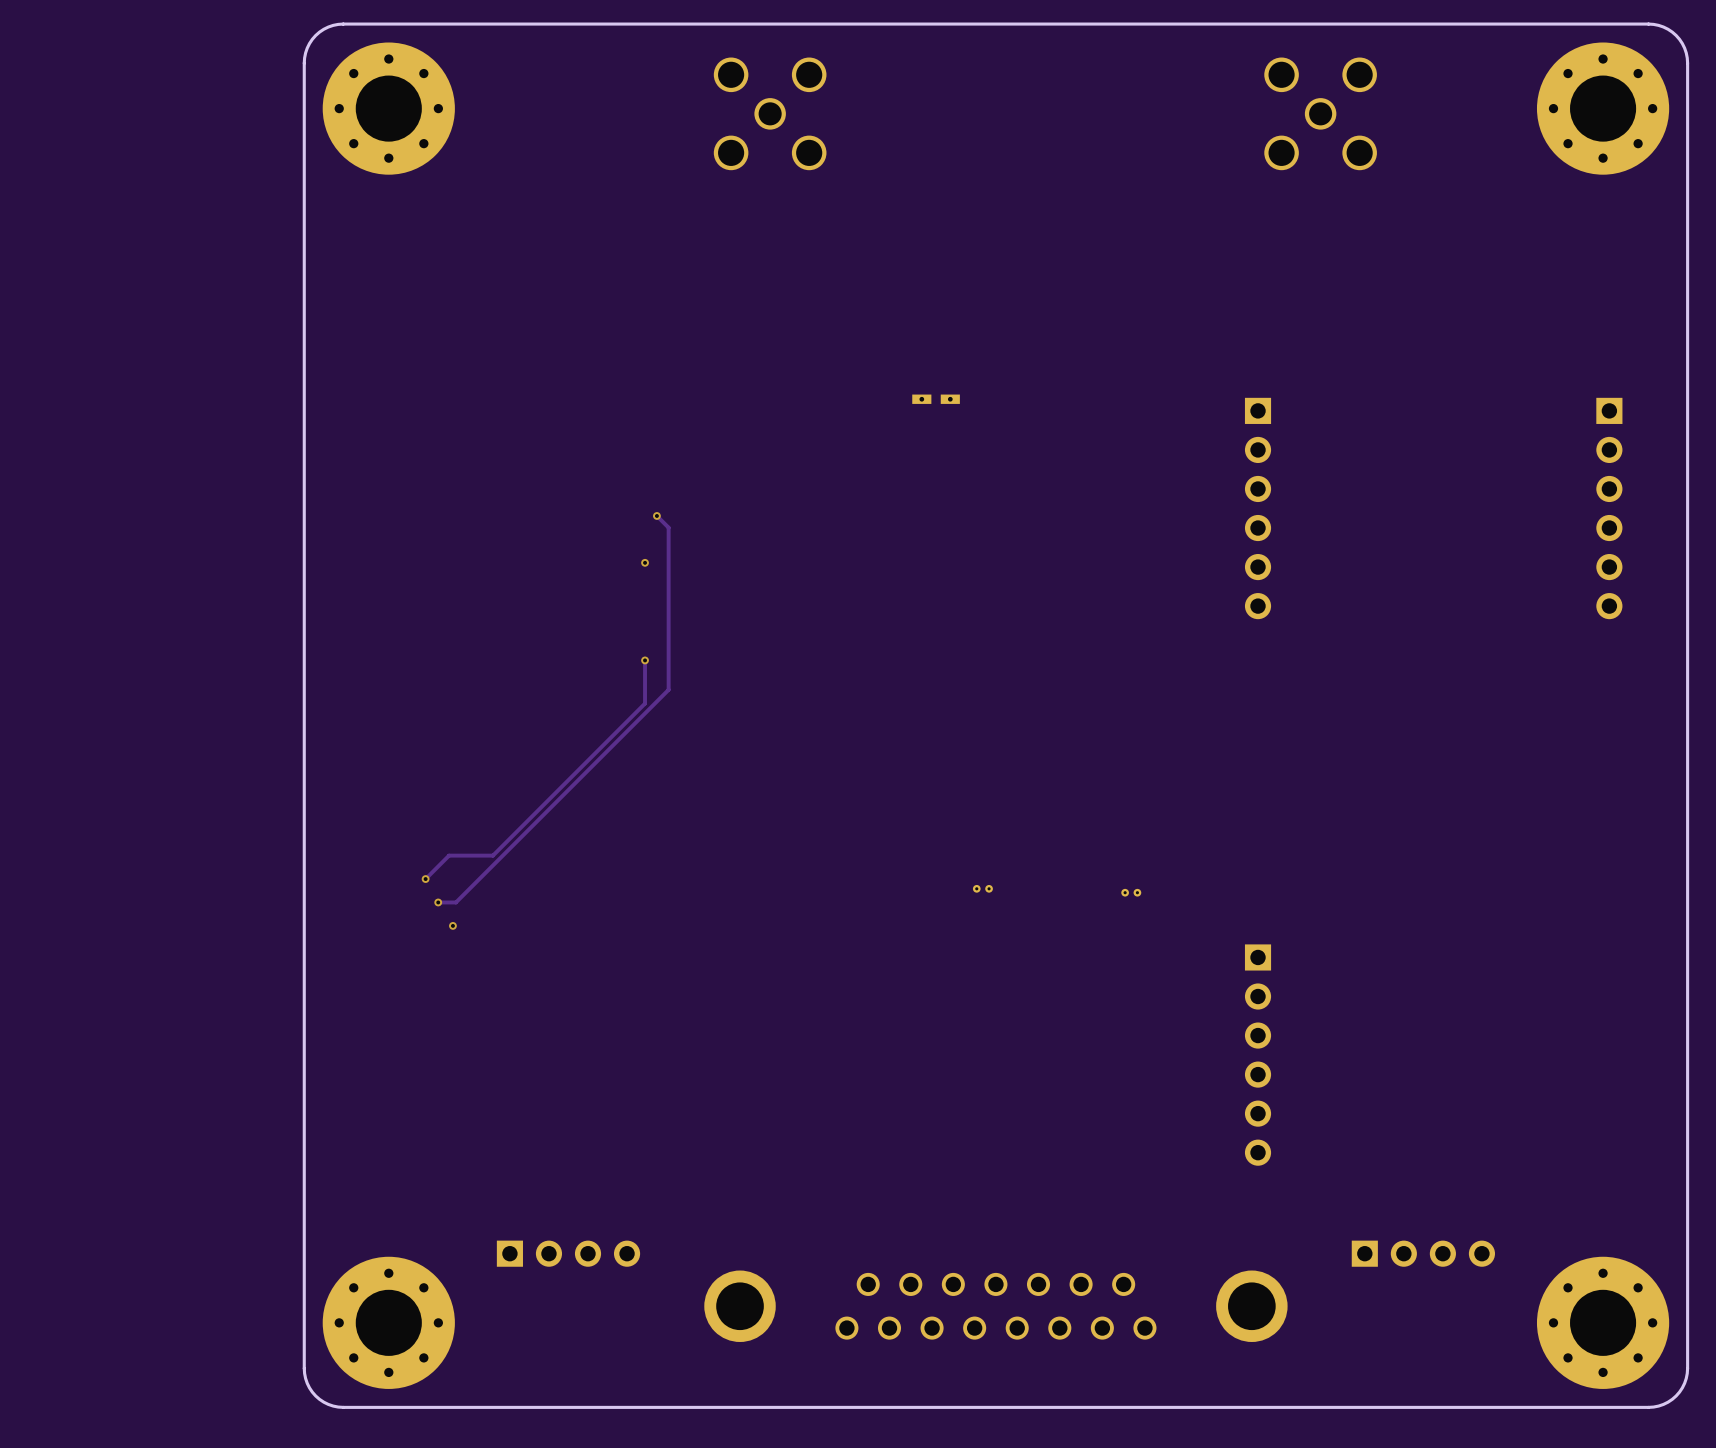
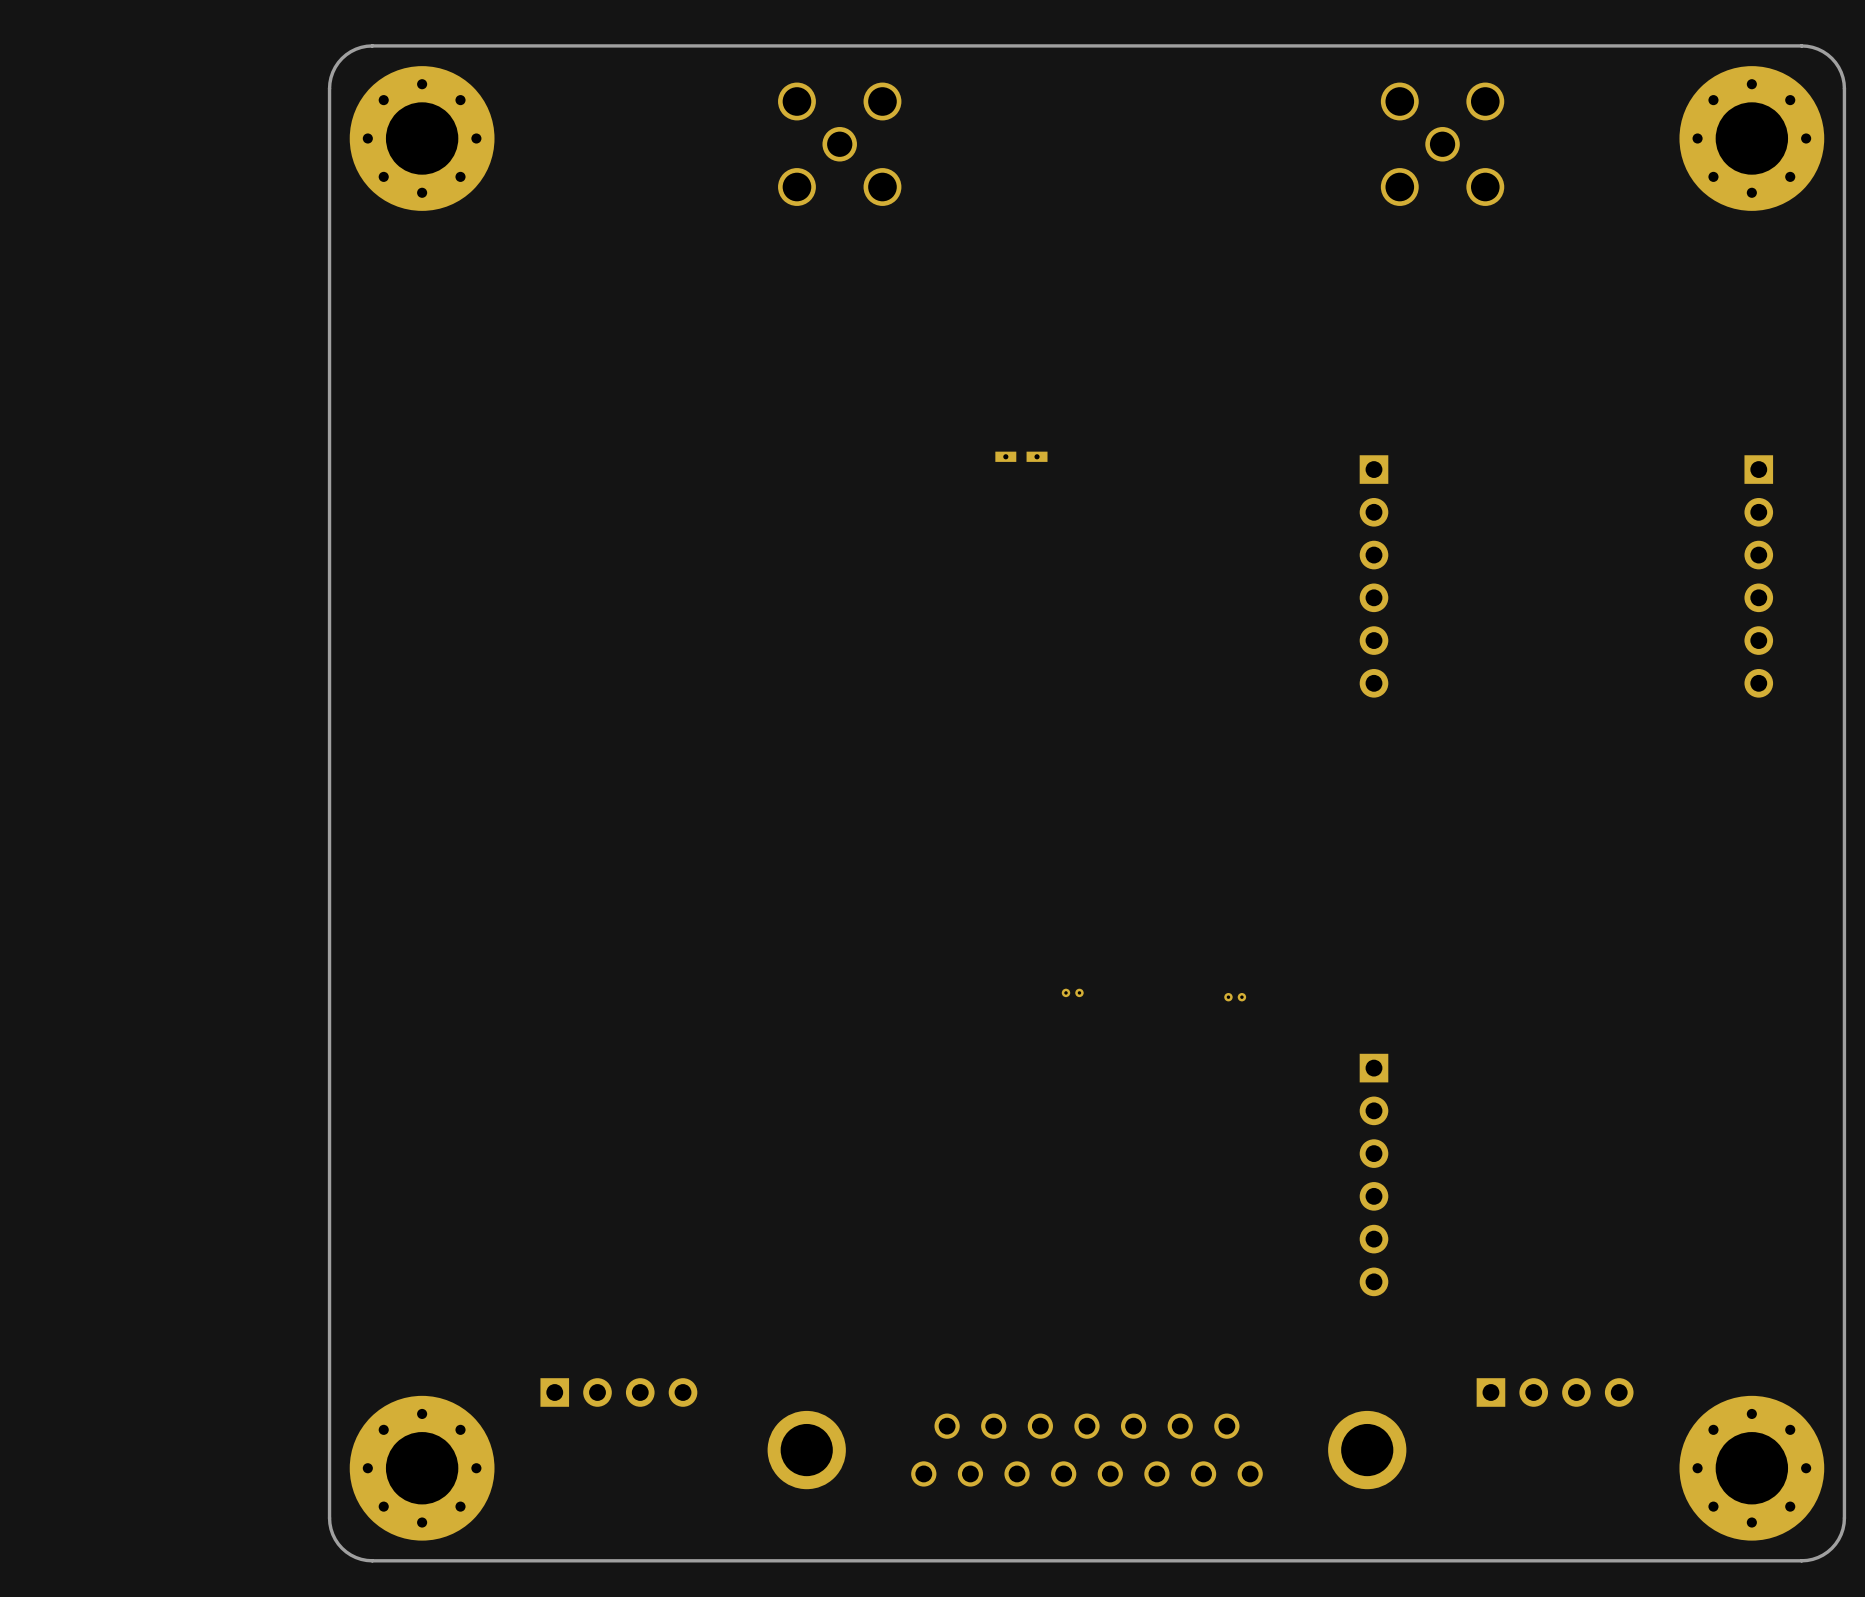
track: (656, 515) (668, 527) (668, 689) (455, 902) (438, 902) -> none
via: (656, 515) -> none
via: (645, 562) -> none
track: (645, 660) (645, 703) (492, 855) (449, 855) (425, 879) -> none
via: (645, 660) -> none
via: (425, 879) -> none
via: (438, 902) -> none
via: (452, 925) -> none

